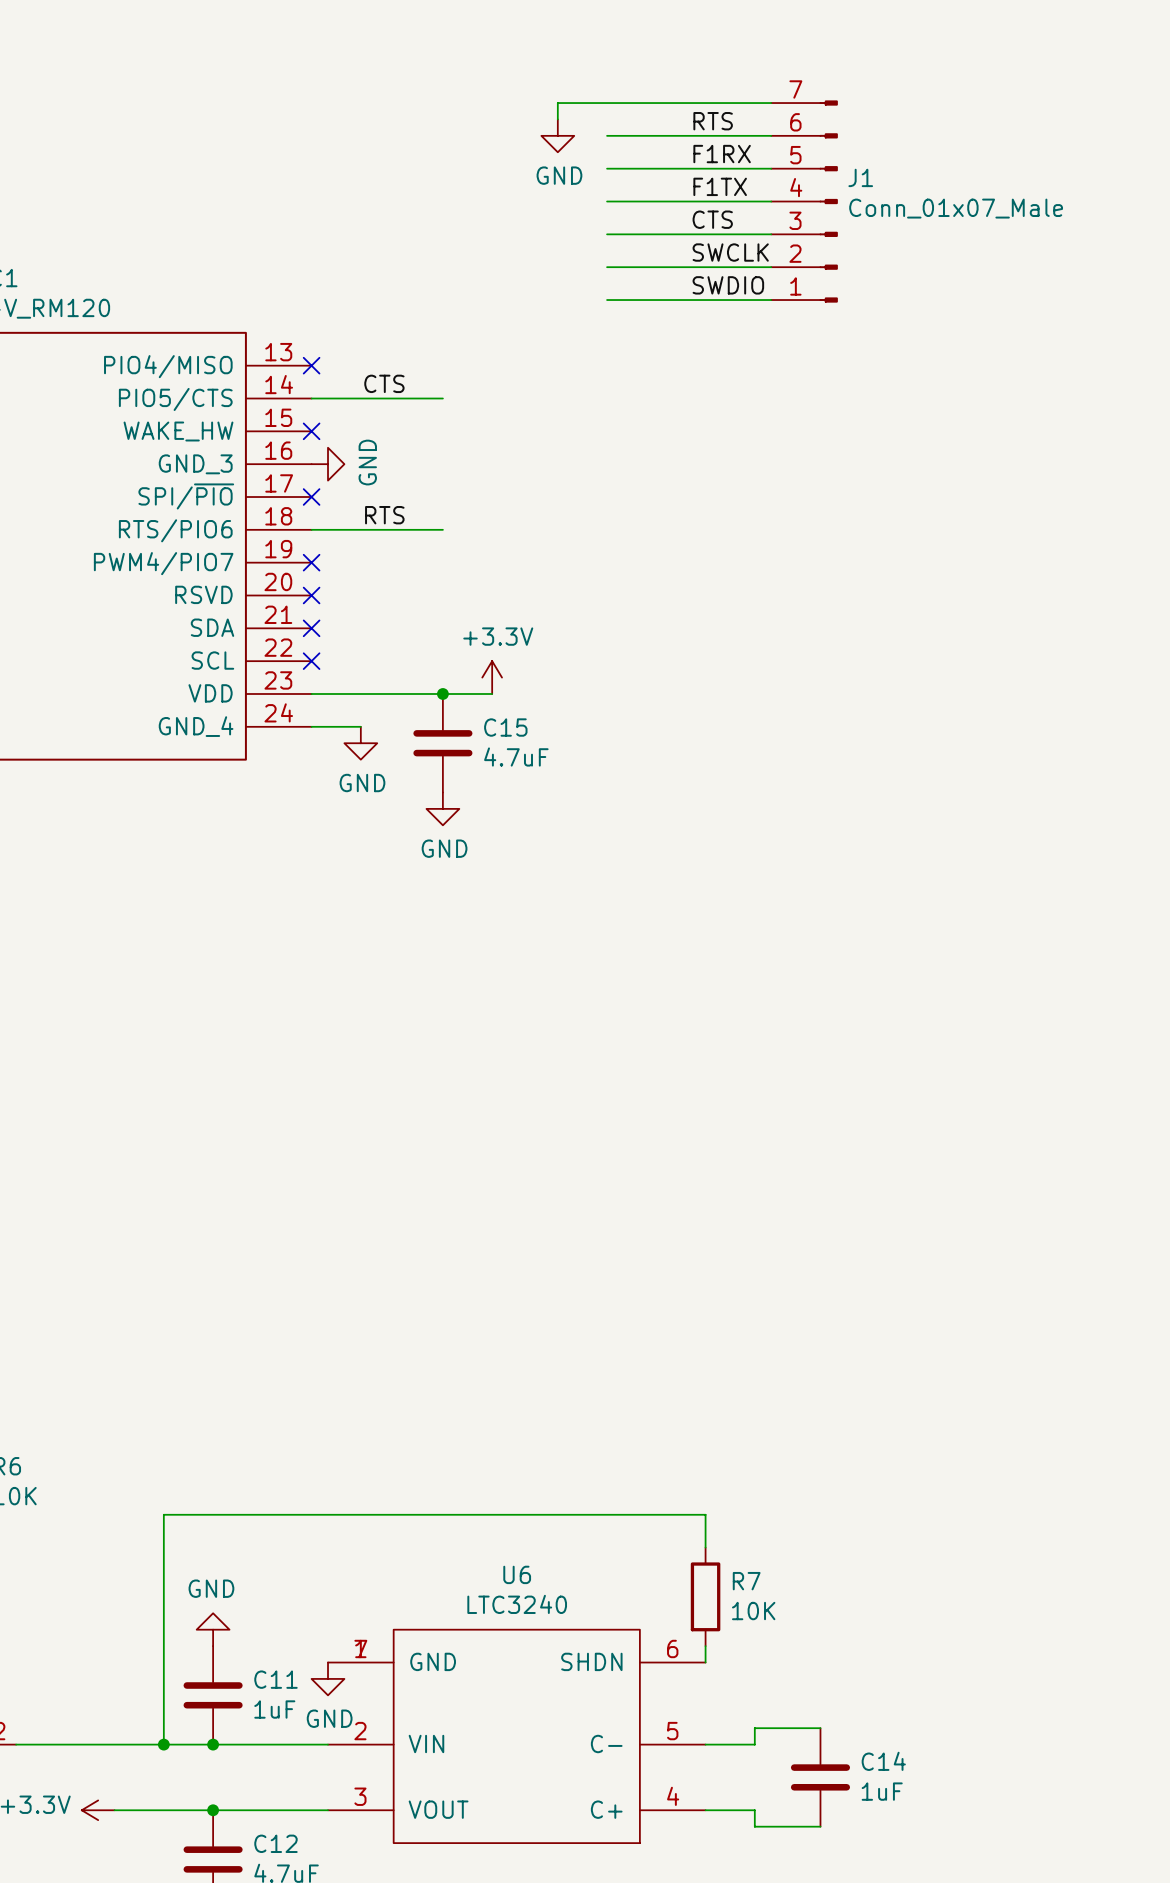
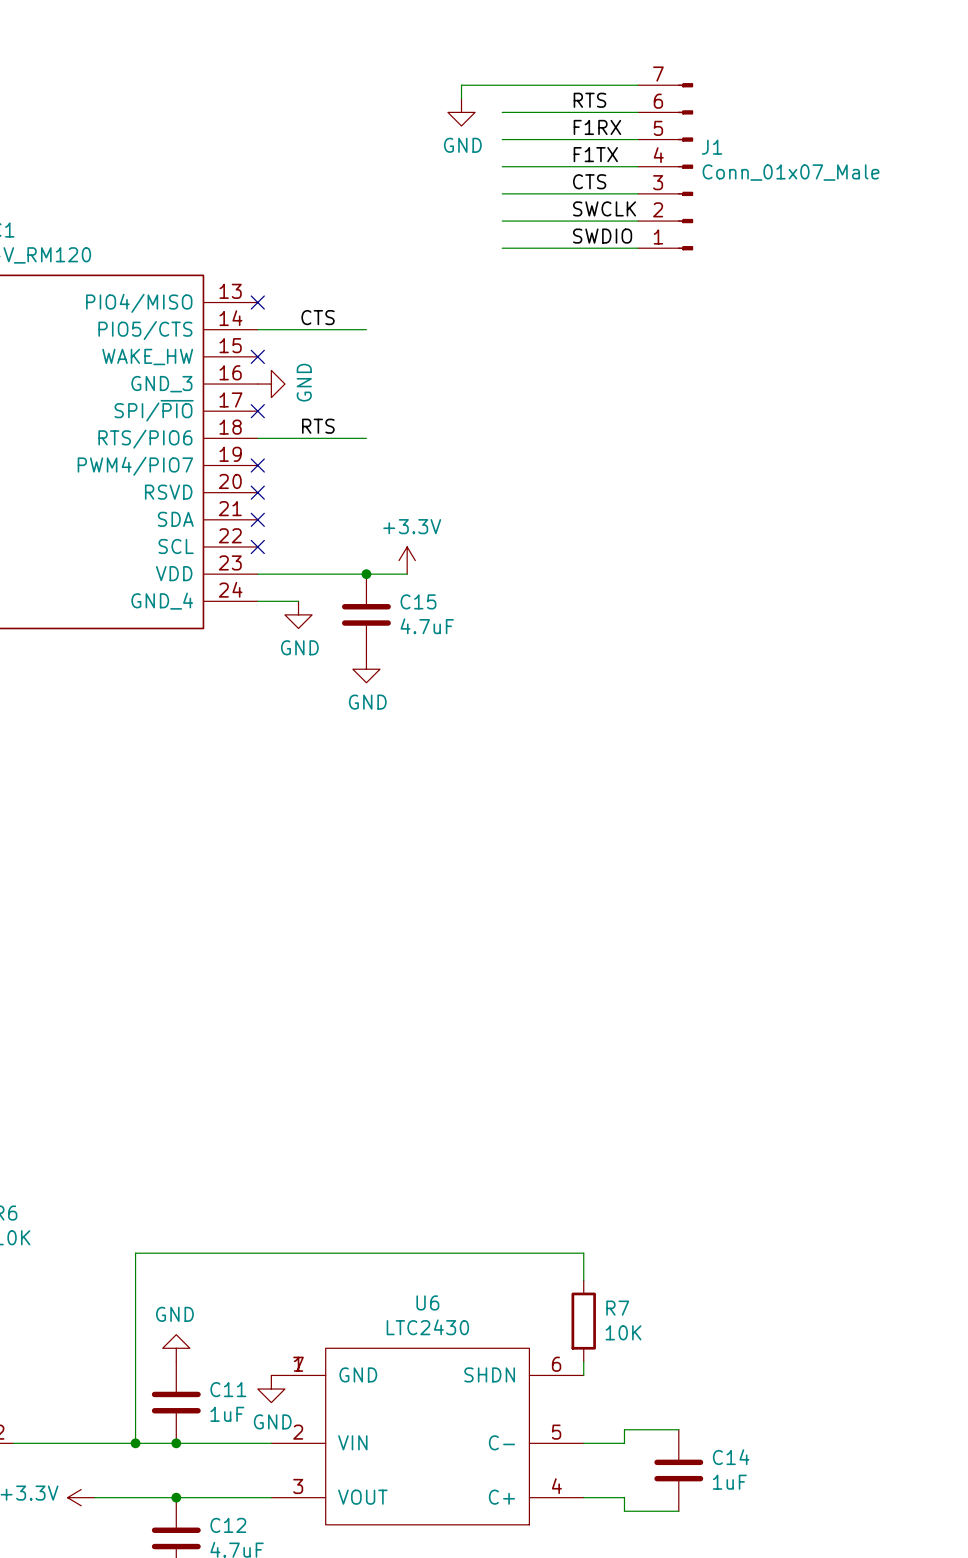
U6 value: LTC3240 (517, 1604) -> LTC2430 (427, 1327)

